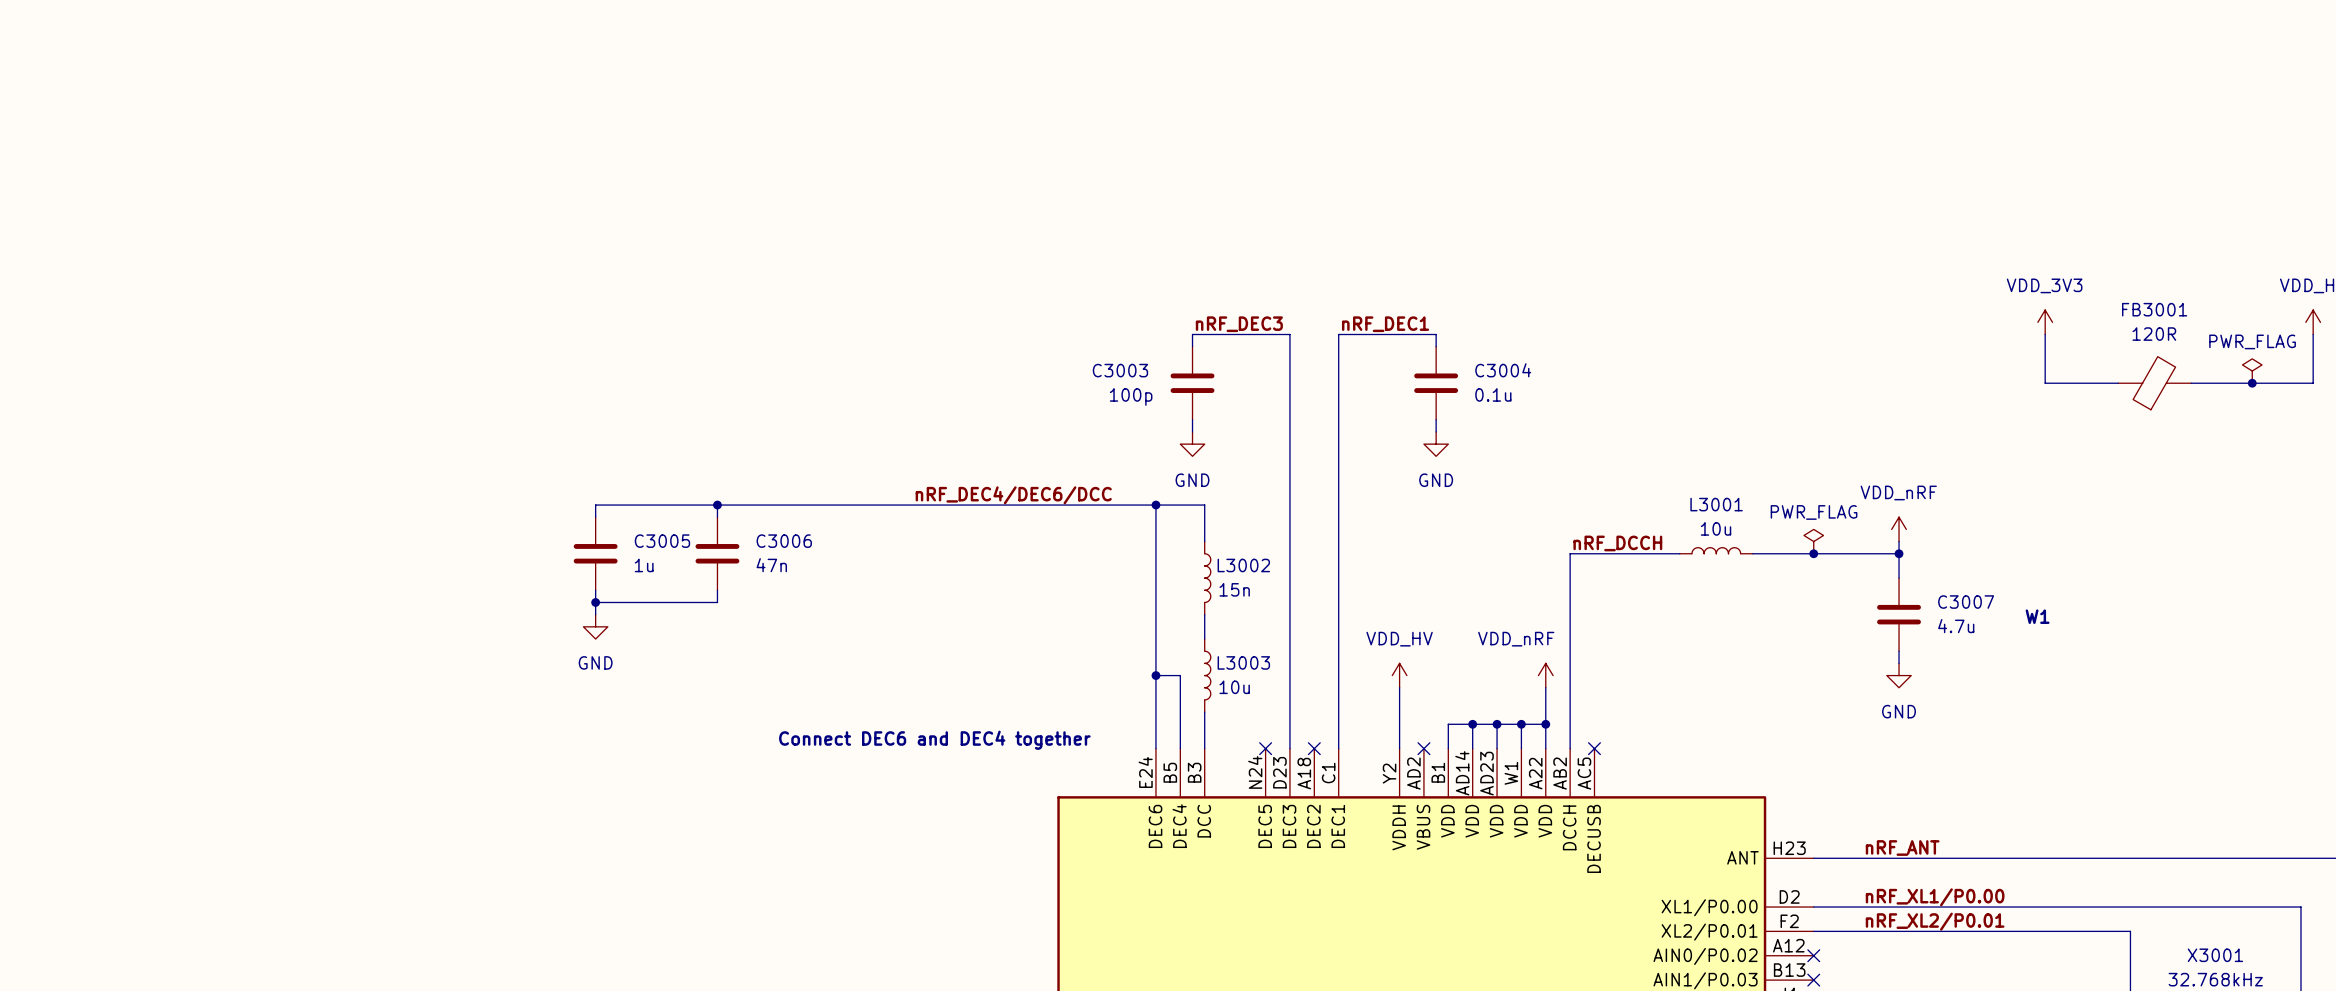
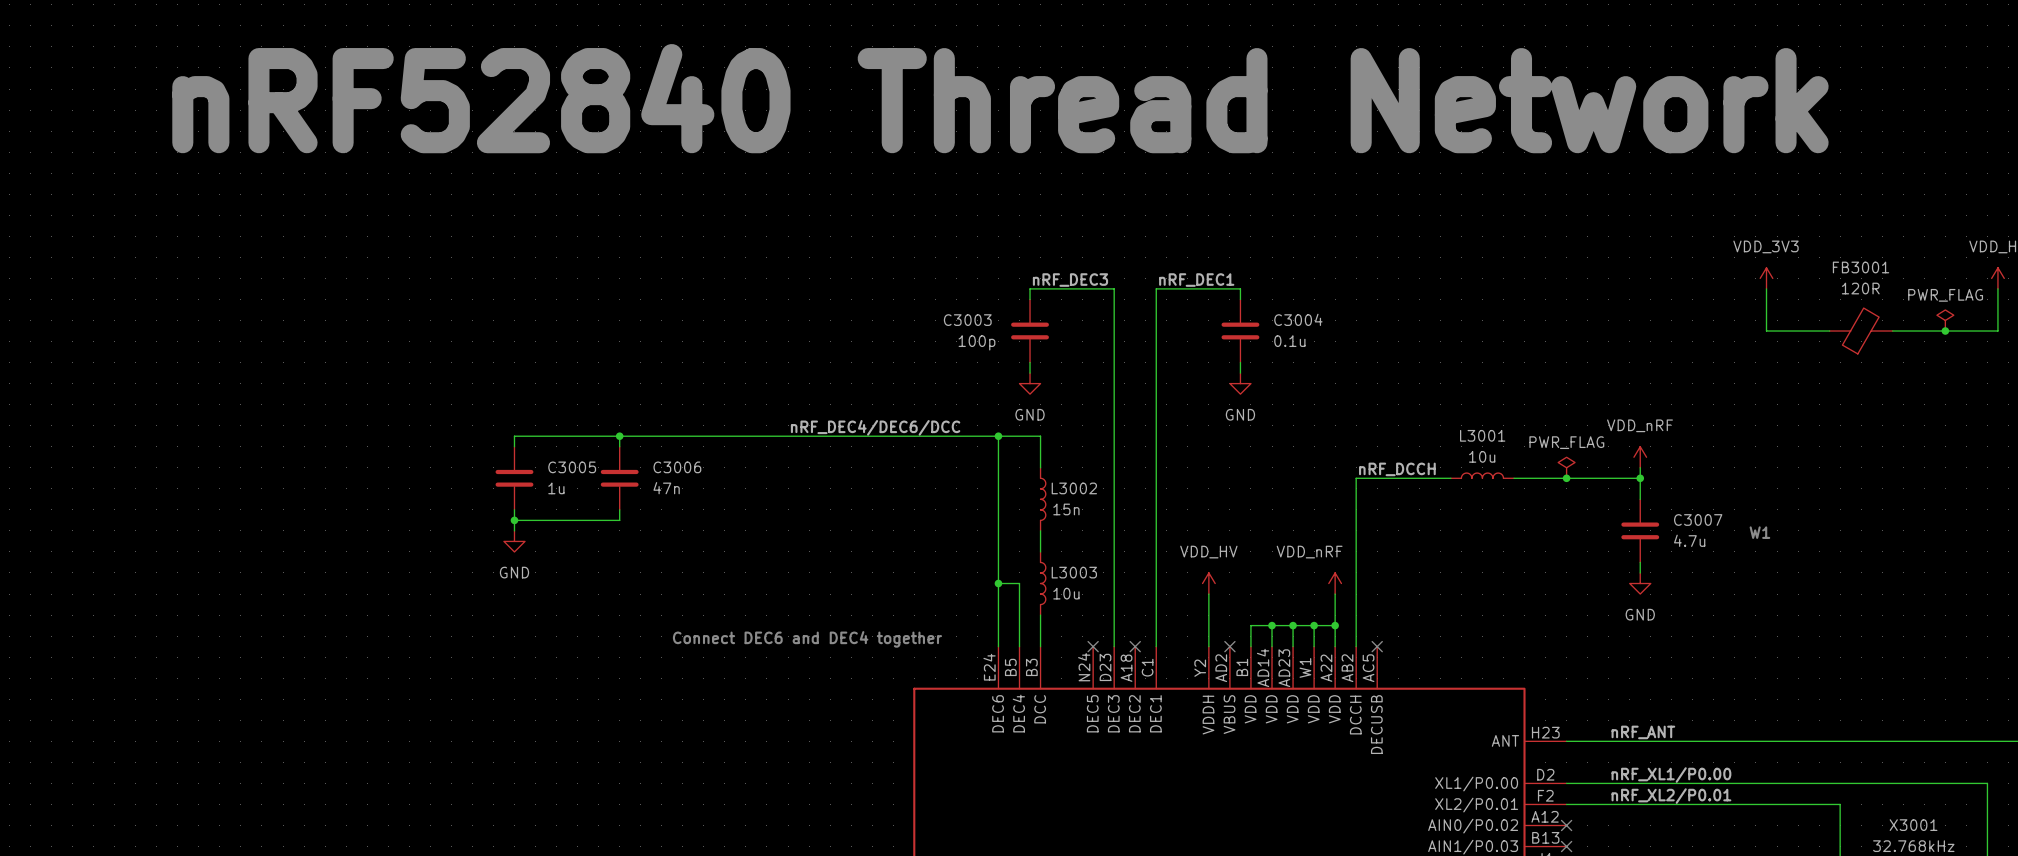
text: none -> nRF52840 Thread Network (1000, 98)

